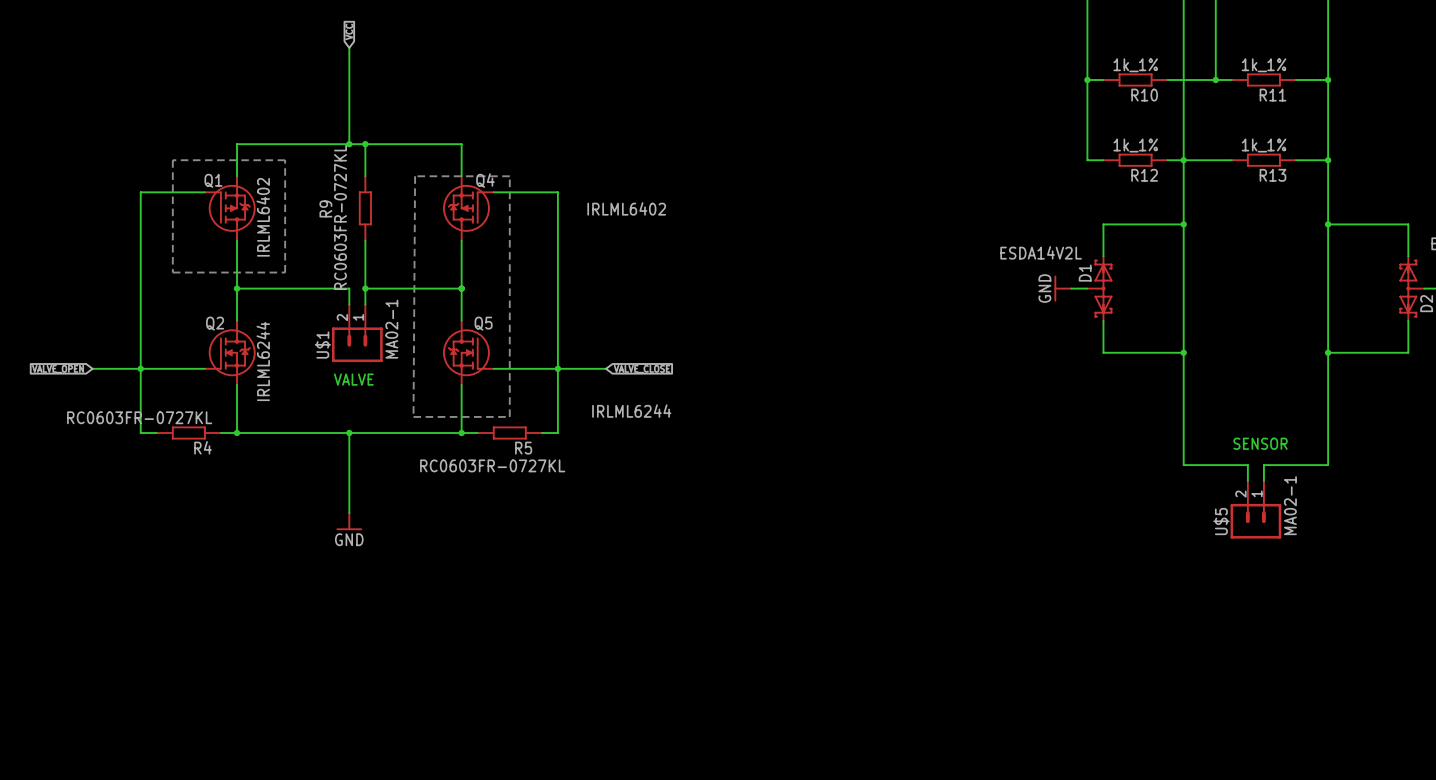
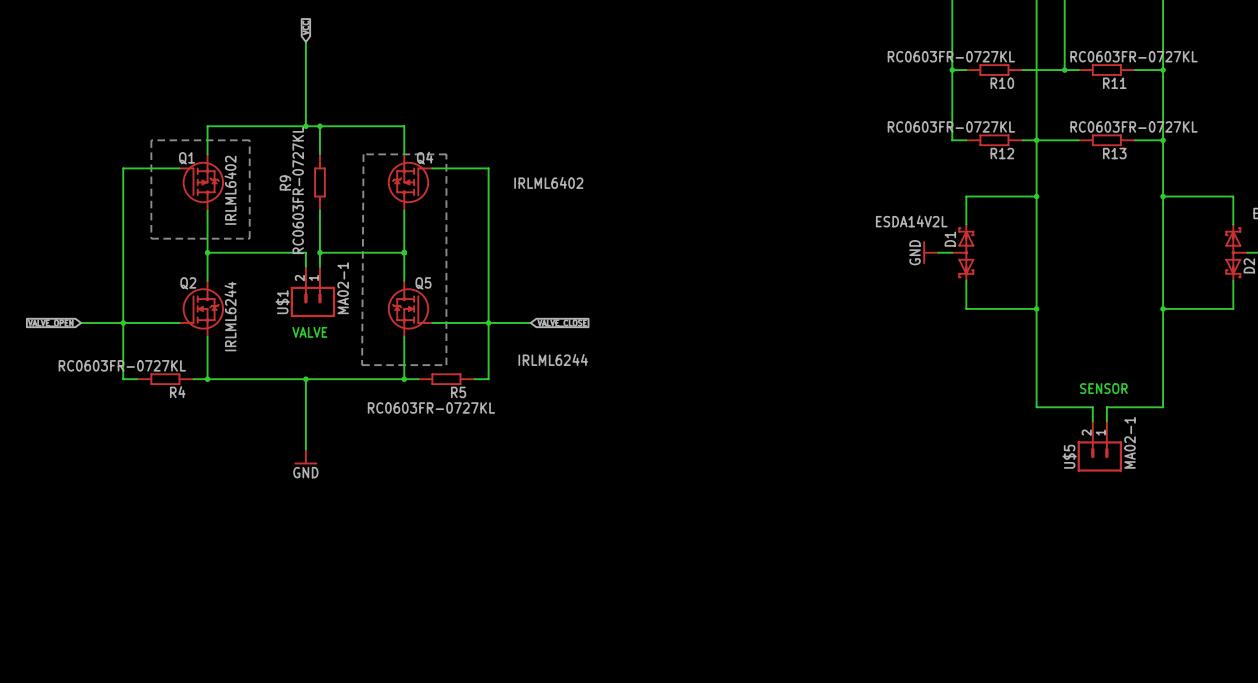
R10 value: 1k_1% (1135, 65) -> RC0603FR-0727KL (951, 56)
R11 value: 1k_1% (1264, 65) -> RC0603FR-0727KL (1134, 56)
R12 value: 1k_1% (1135, 145) -> RC0603FR-0727KL (951, 126)
R13 value: 1k_1% (1264, 145) -> RC0603FR-0727KL (1134, 126)

